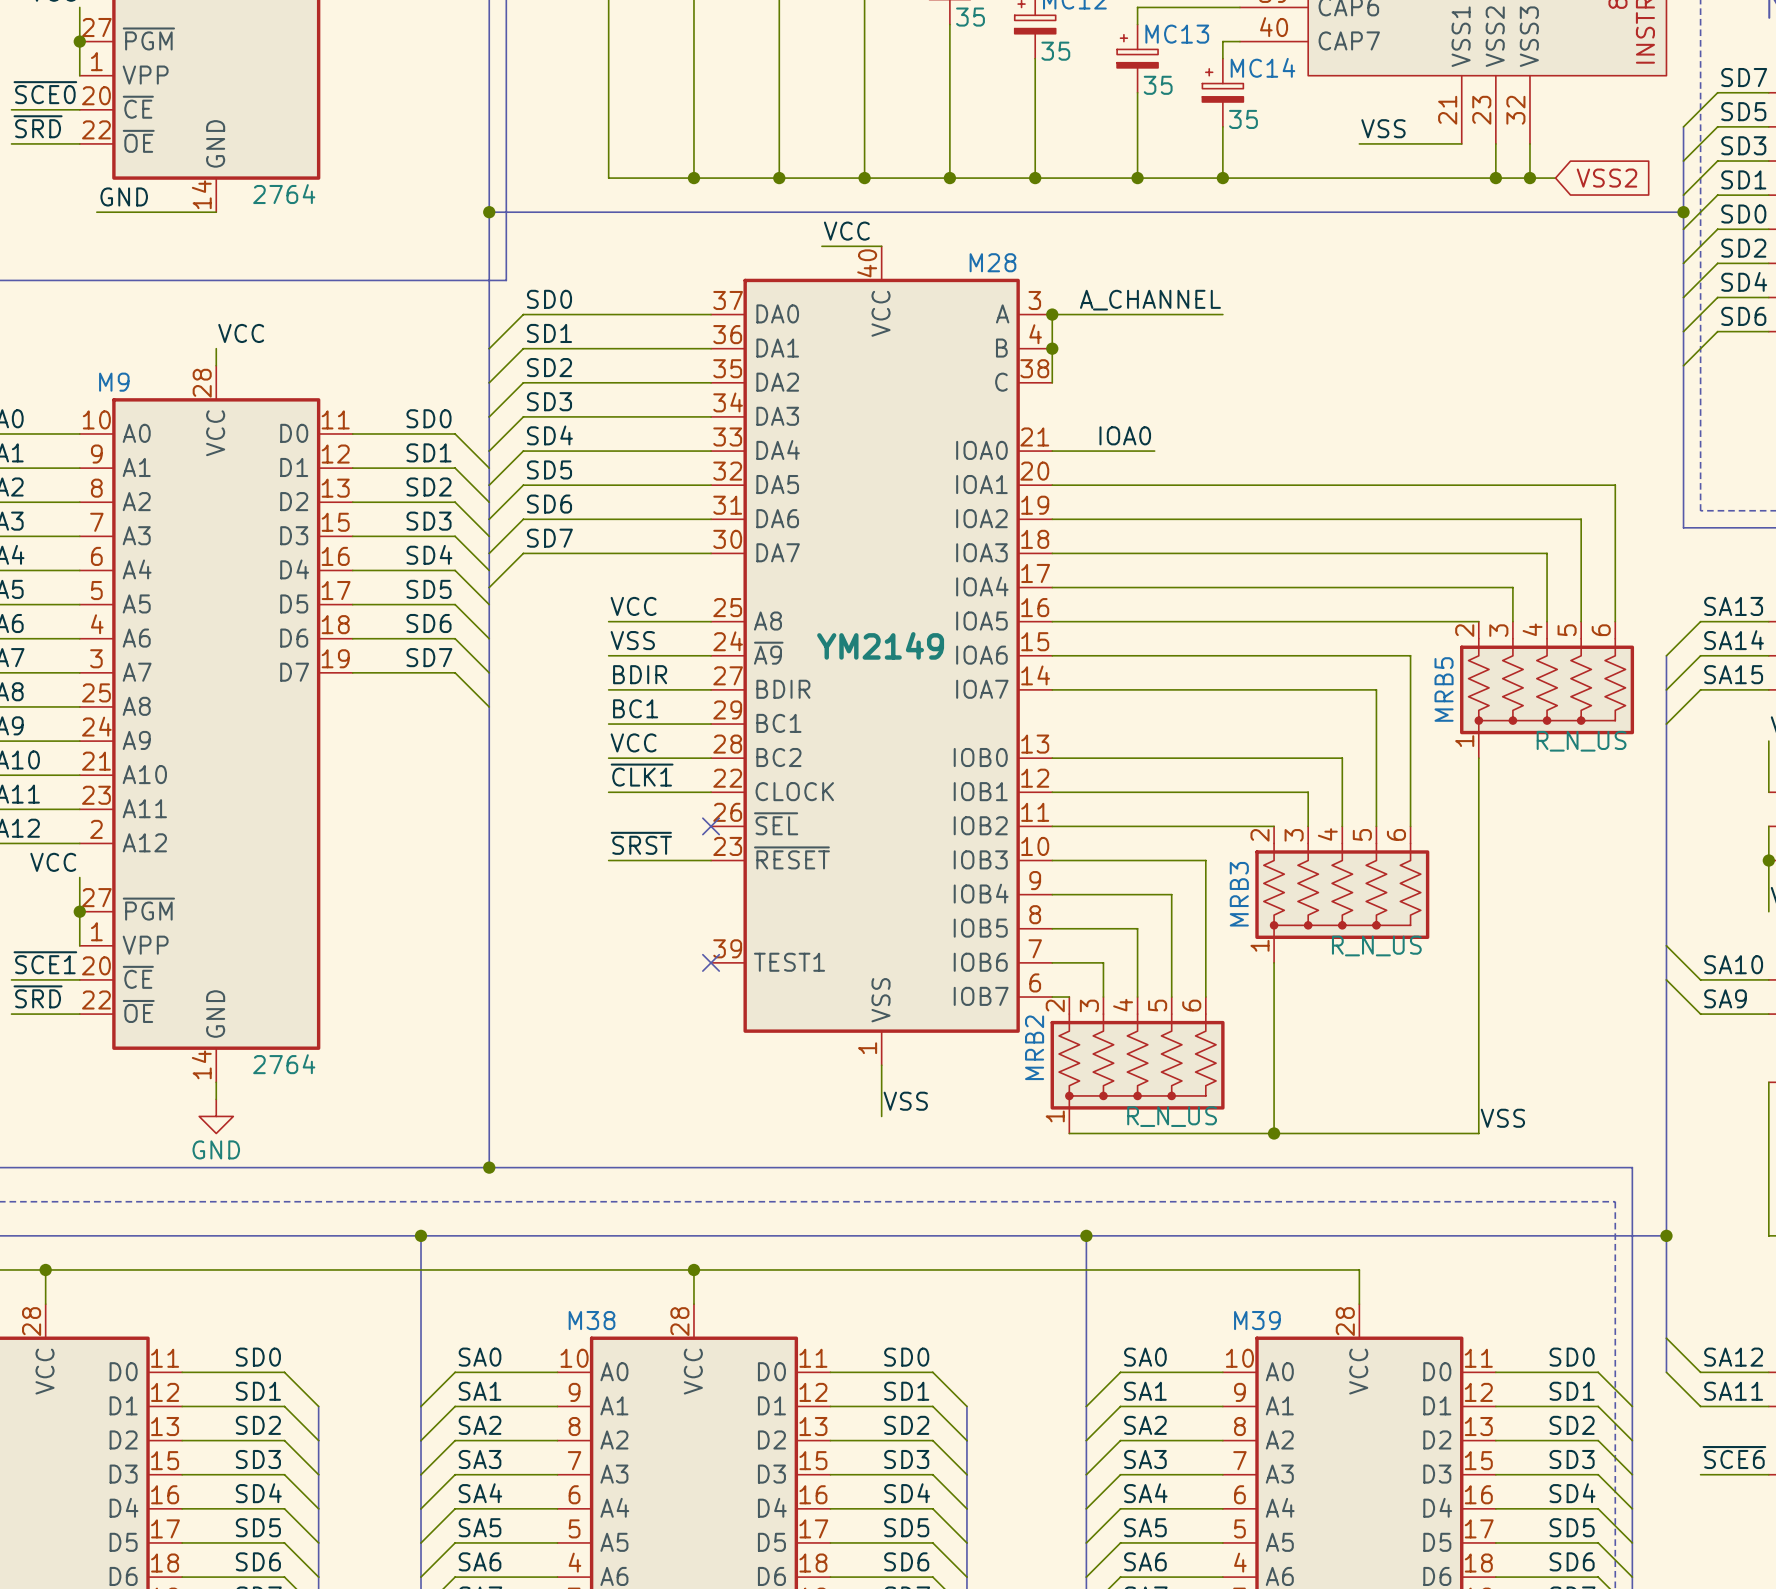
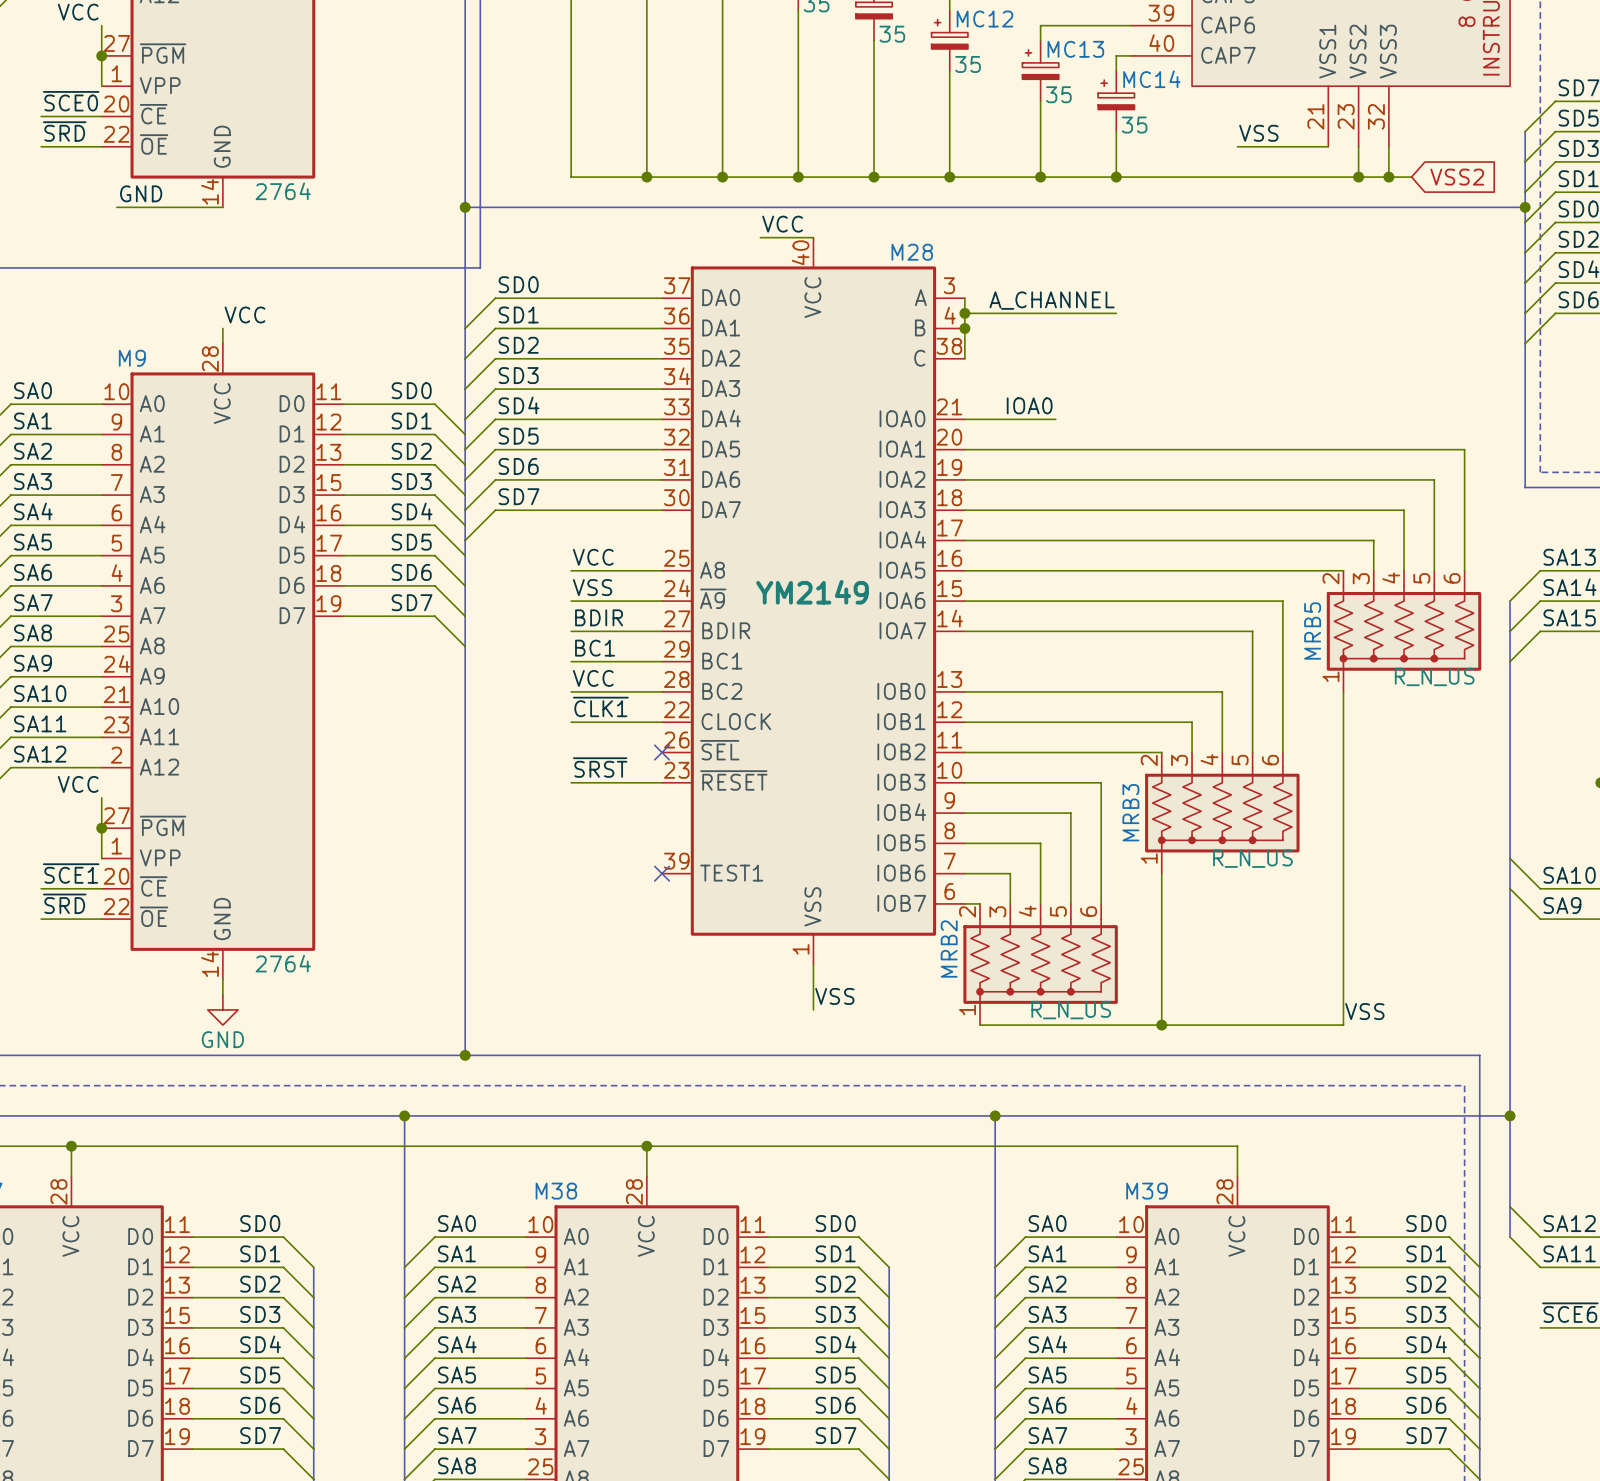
label position: A_CHANNEL (1150, 300) -> A_CHANNEL (1052, 300)
wire: (1052, 314) (1222, 314) -> (964, 313) (1116, 313)
junction position: (1052, 314) -> (964, 313)

